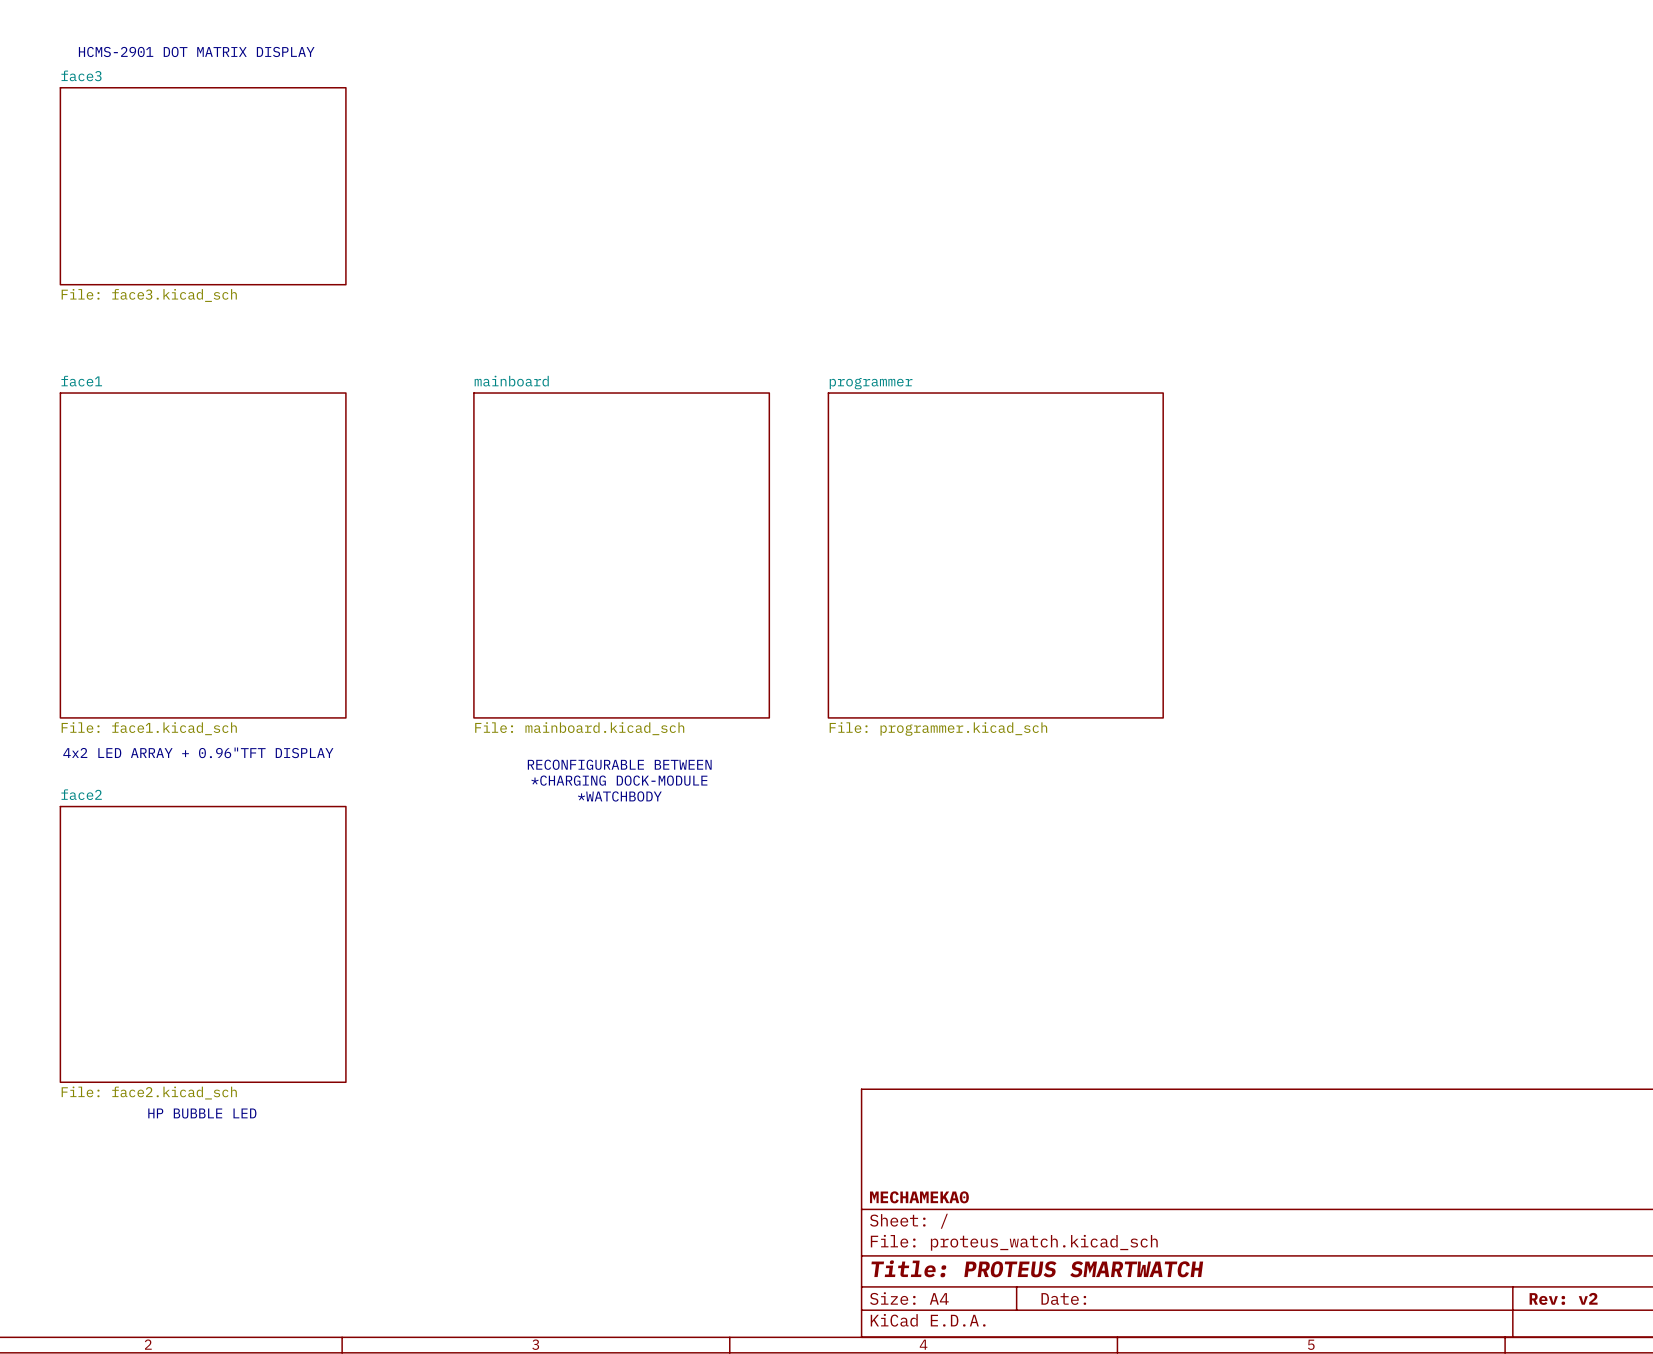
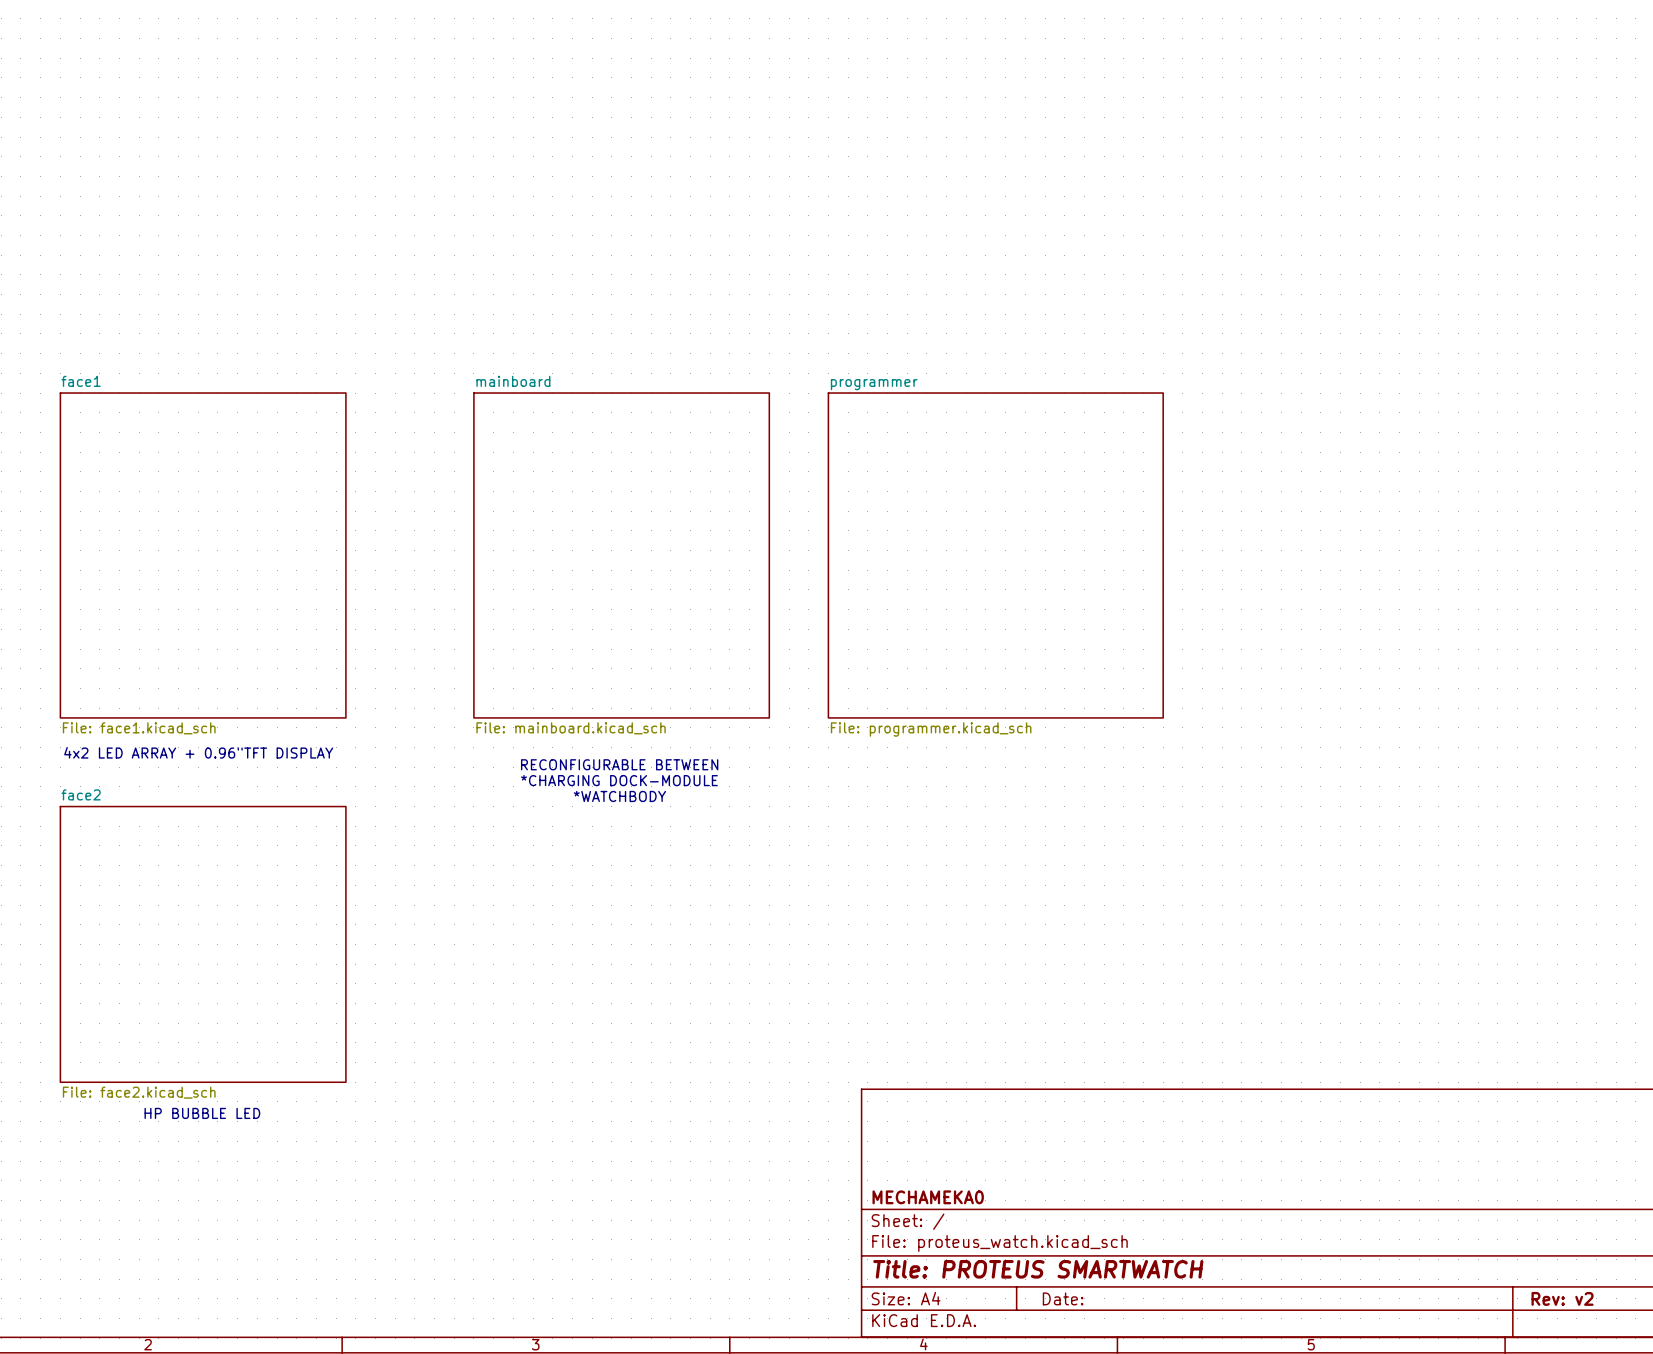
text: HCMS-2901 DOT MATRIX DISPLAY (196, 51) -> none
sheet face3: File: face3.kicad_sch (203, 186) -> none

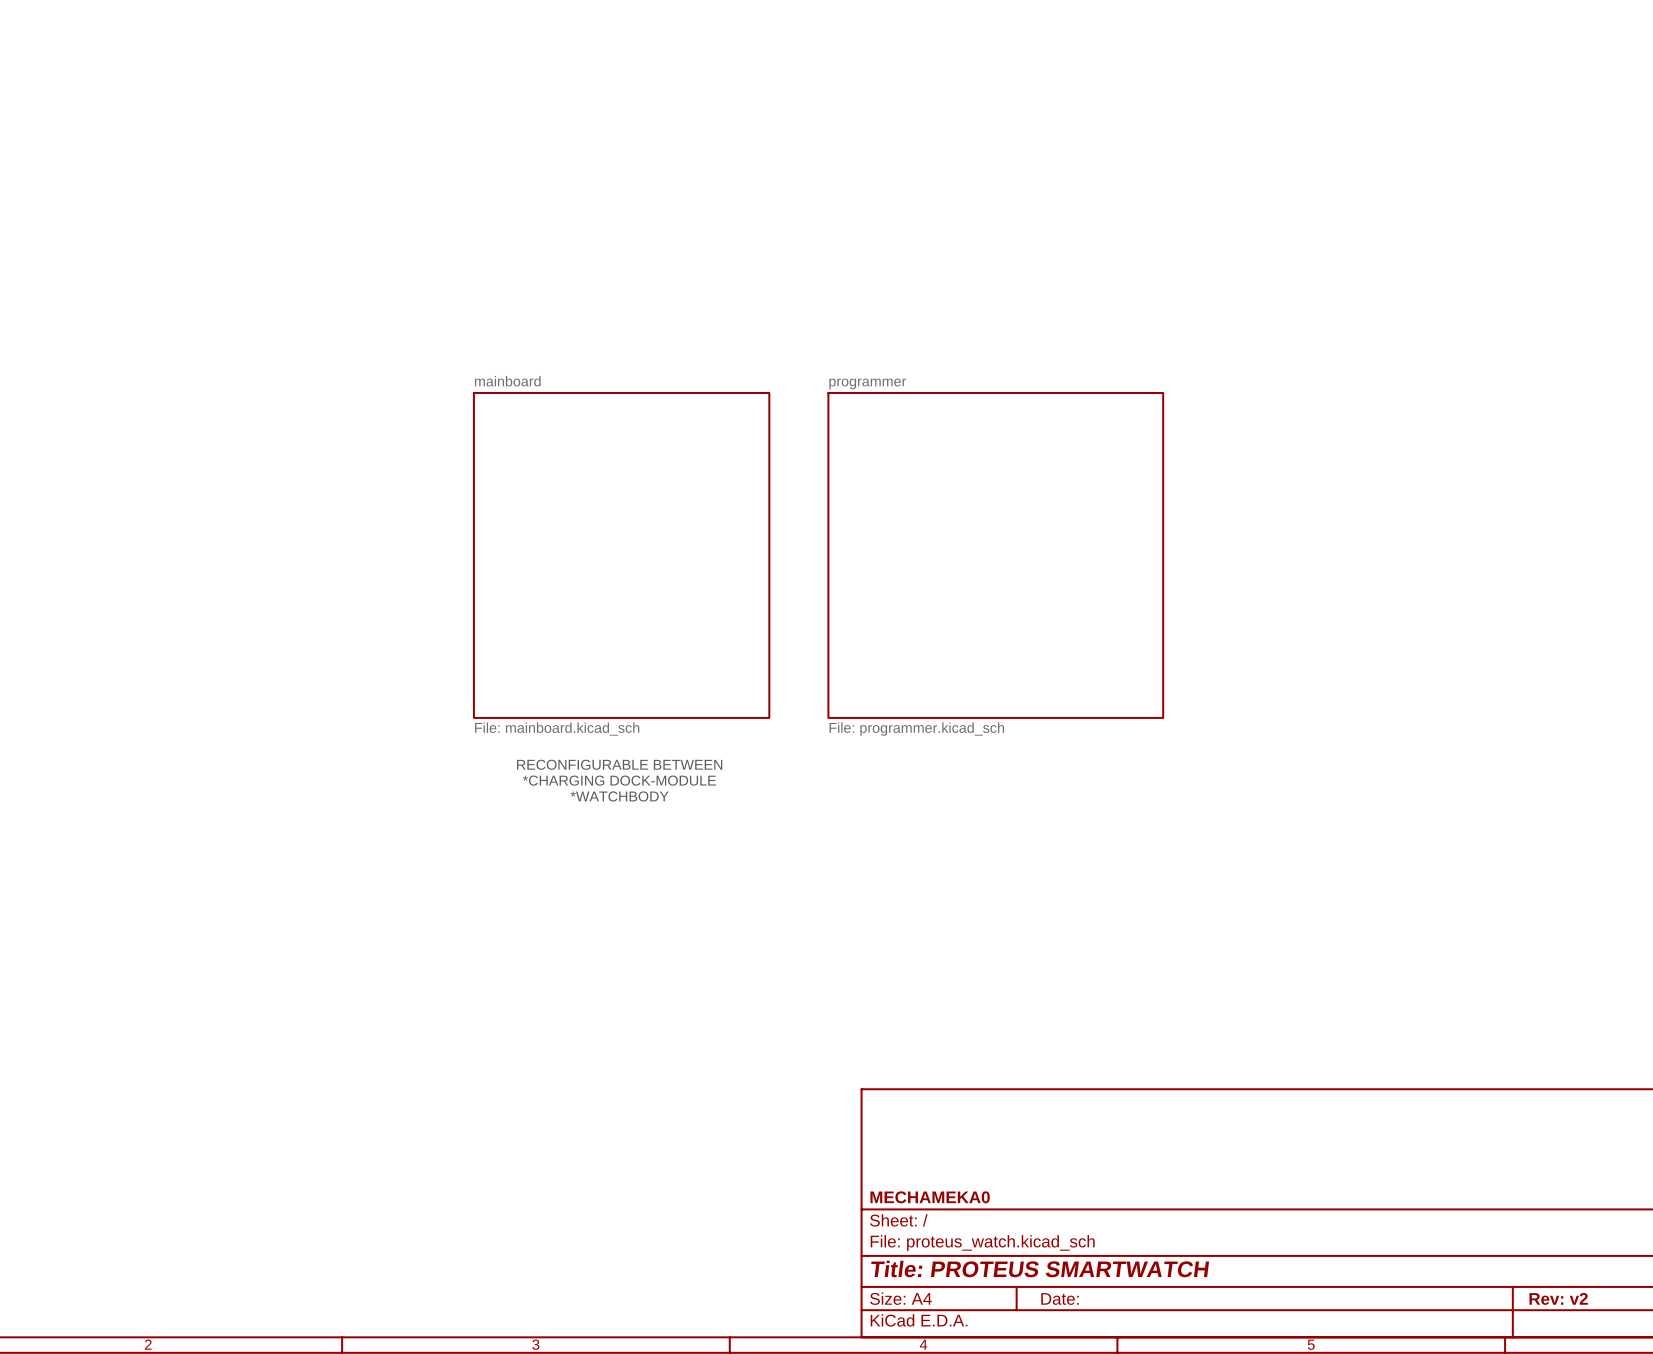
sheet face1: File: face1.kicad_sch (203, 555) -> none
text: 4x2 LED ARRAY + 0.96"TFT DISPLAY (198, 752) -> none
sheet face2: File: face2.kicad_sch (203, 944) -> none
text: HP BUBBLE LED (202, 1113) -> none

